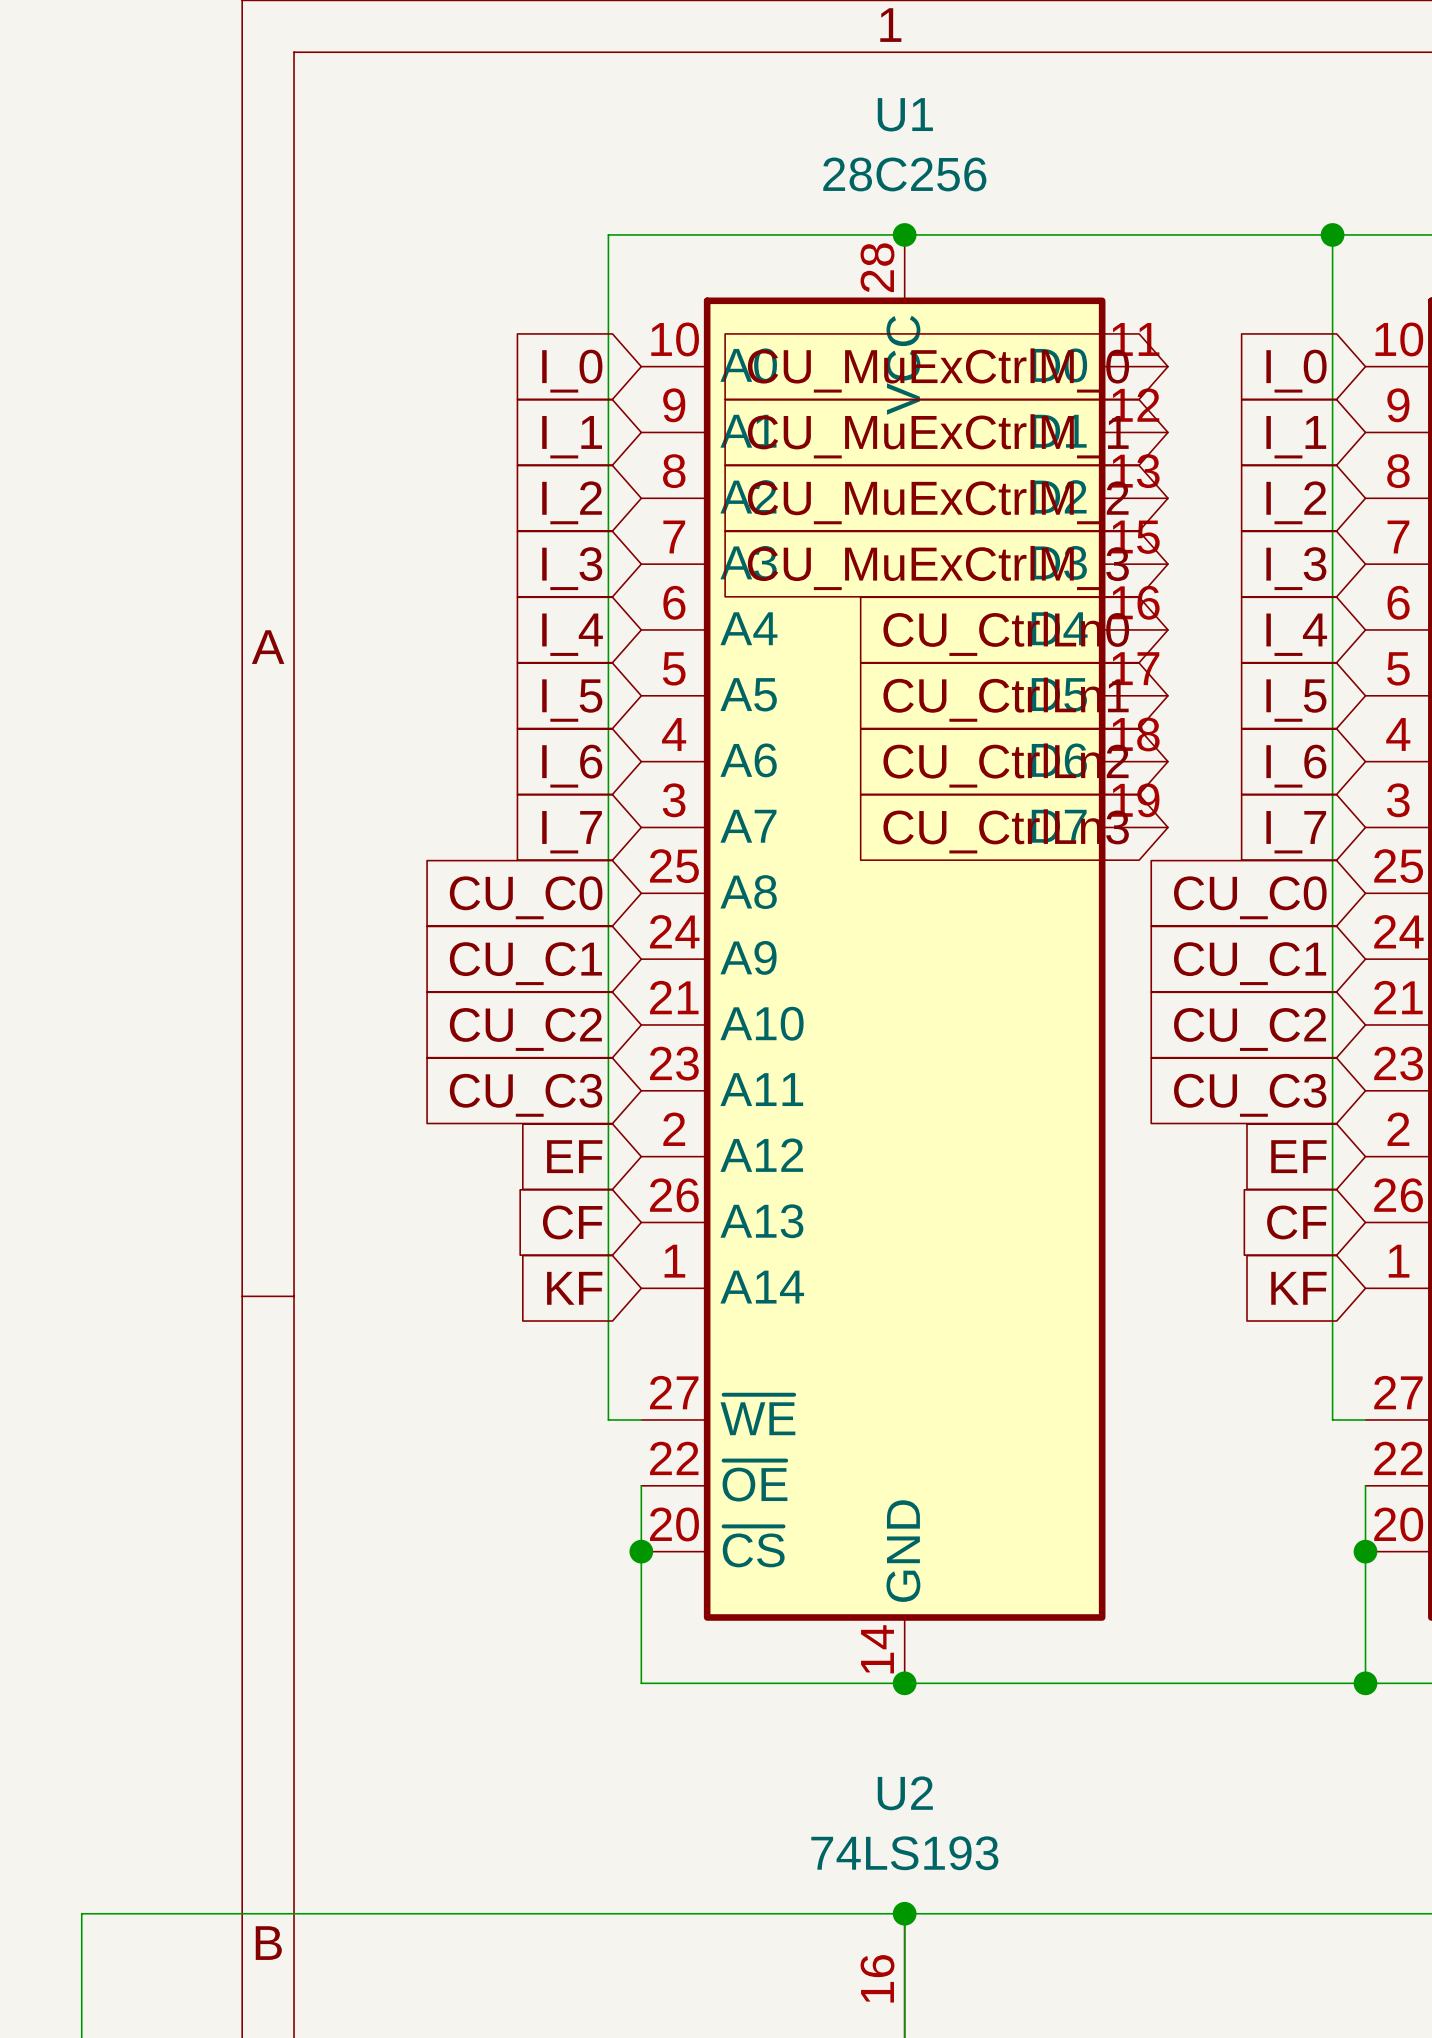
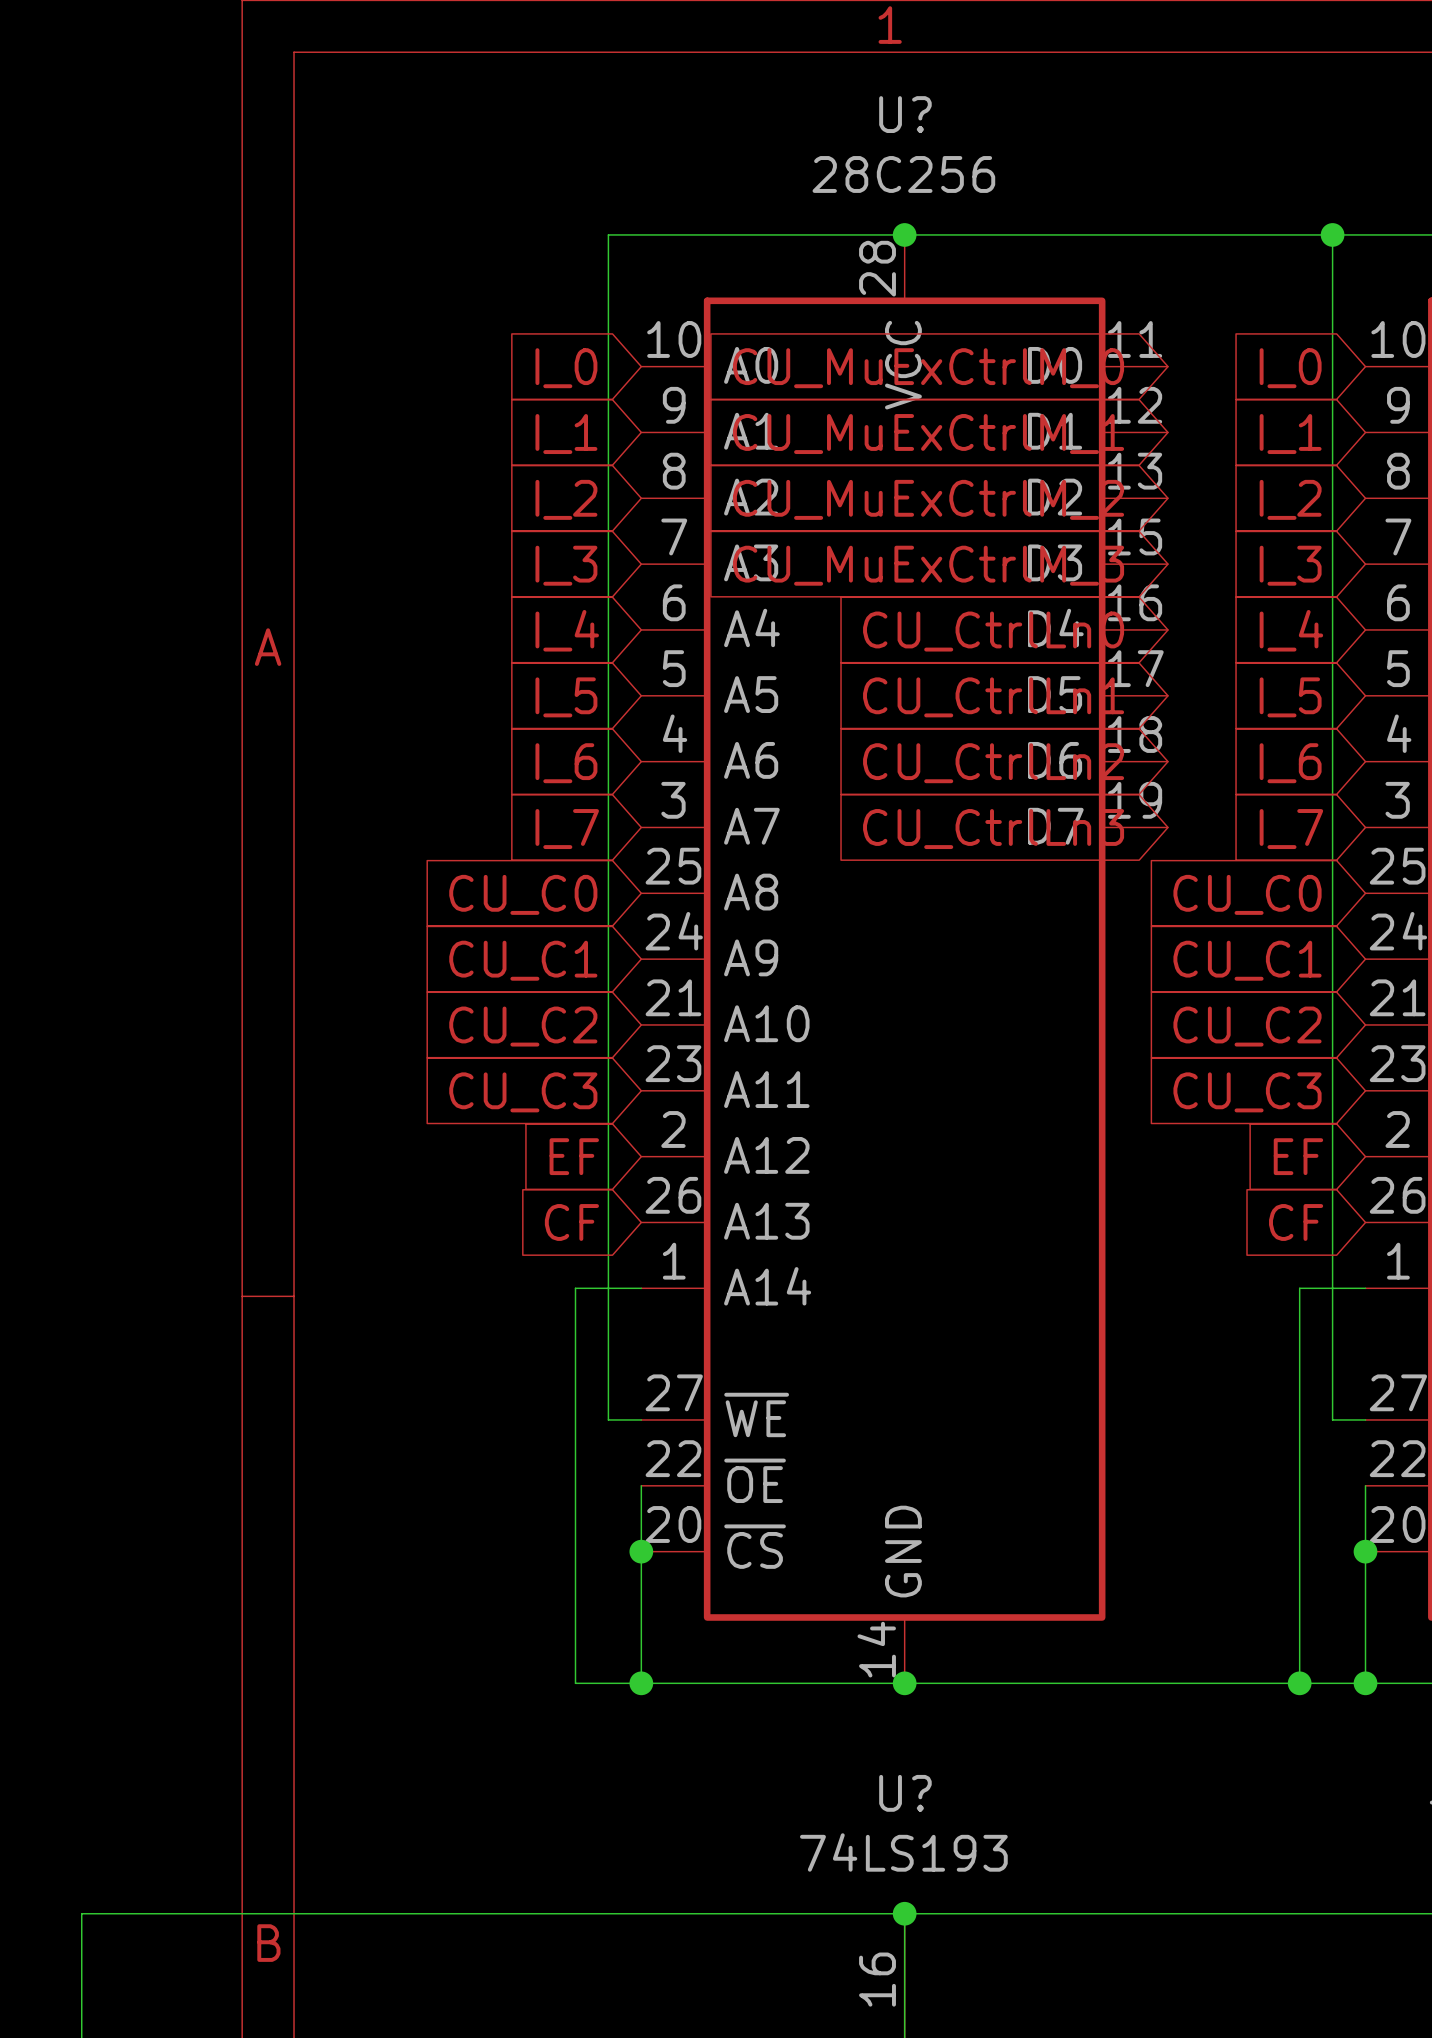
U1 name: U1 (905, 114) -> U? (905, 114)
global label: KF (574, 1288) -> none
wire: none -> (641, 1288) (575, 1288) (575, 1683) (641, 1683)
global label: KF (1298, 1288) -> none
wire: none -> (1365, 1288) (1299, 1288) (1299, 1683)
junction: none -> (641, 1683)
junction: none -> (1299, 1683)
U2 name: U2 (905, 1793) -> U? (905, 1793)

